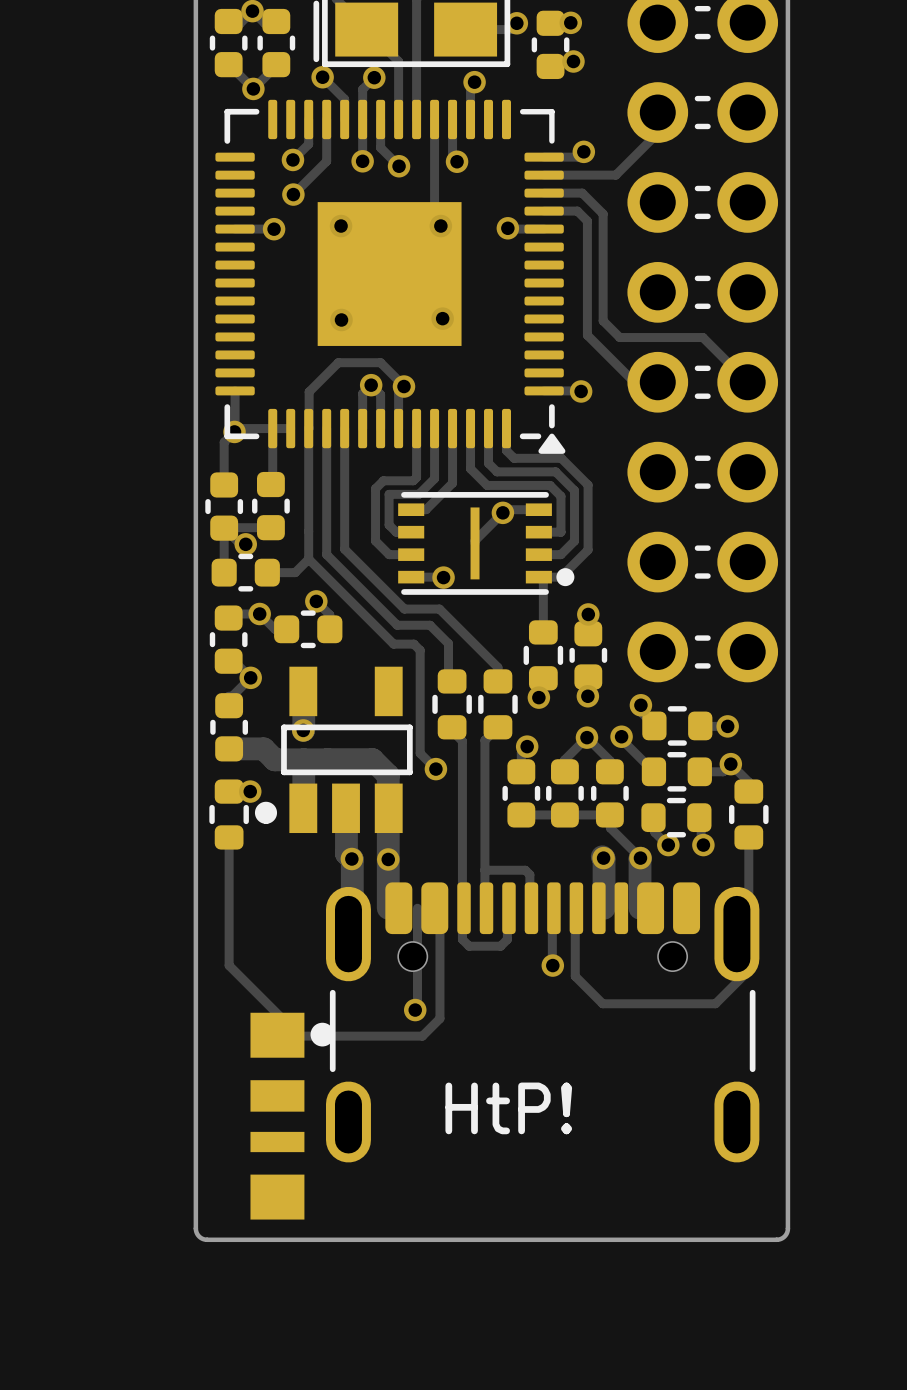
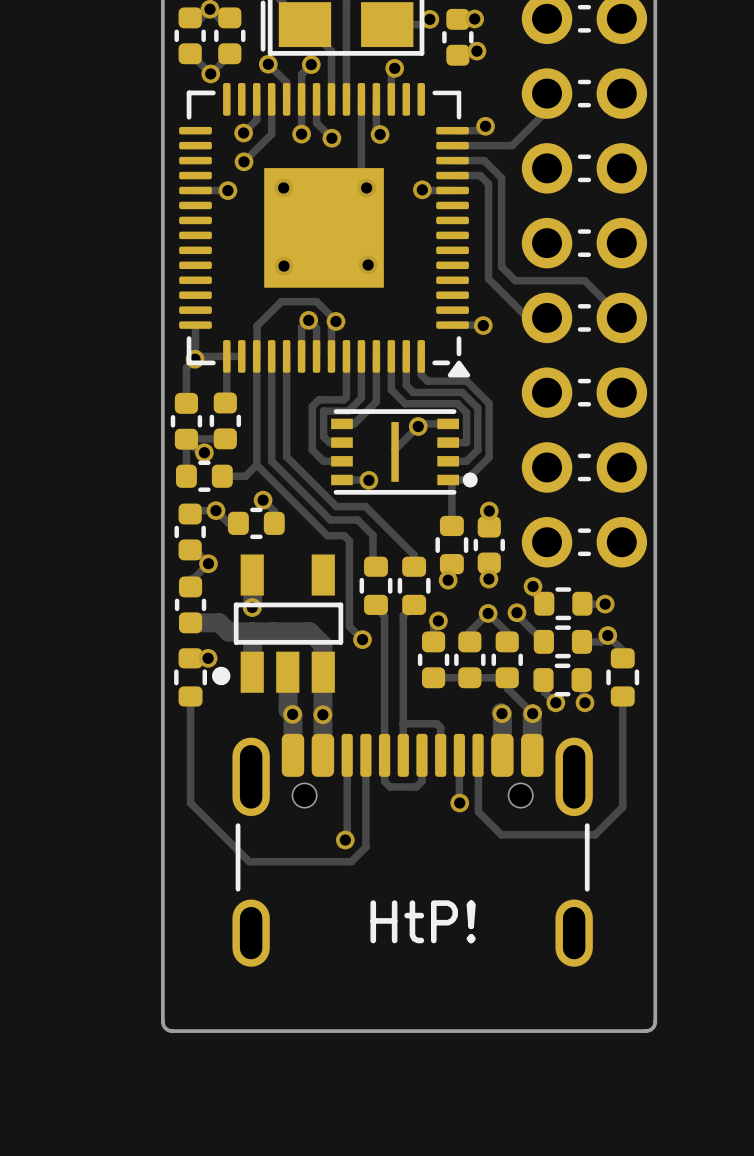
part position: (542, 1022) -> (412, 850)
part: (292, 1116) -> none

